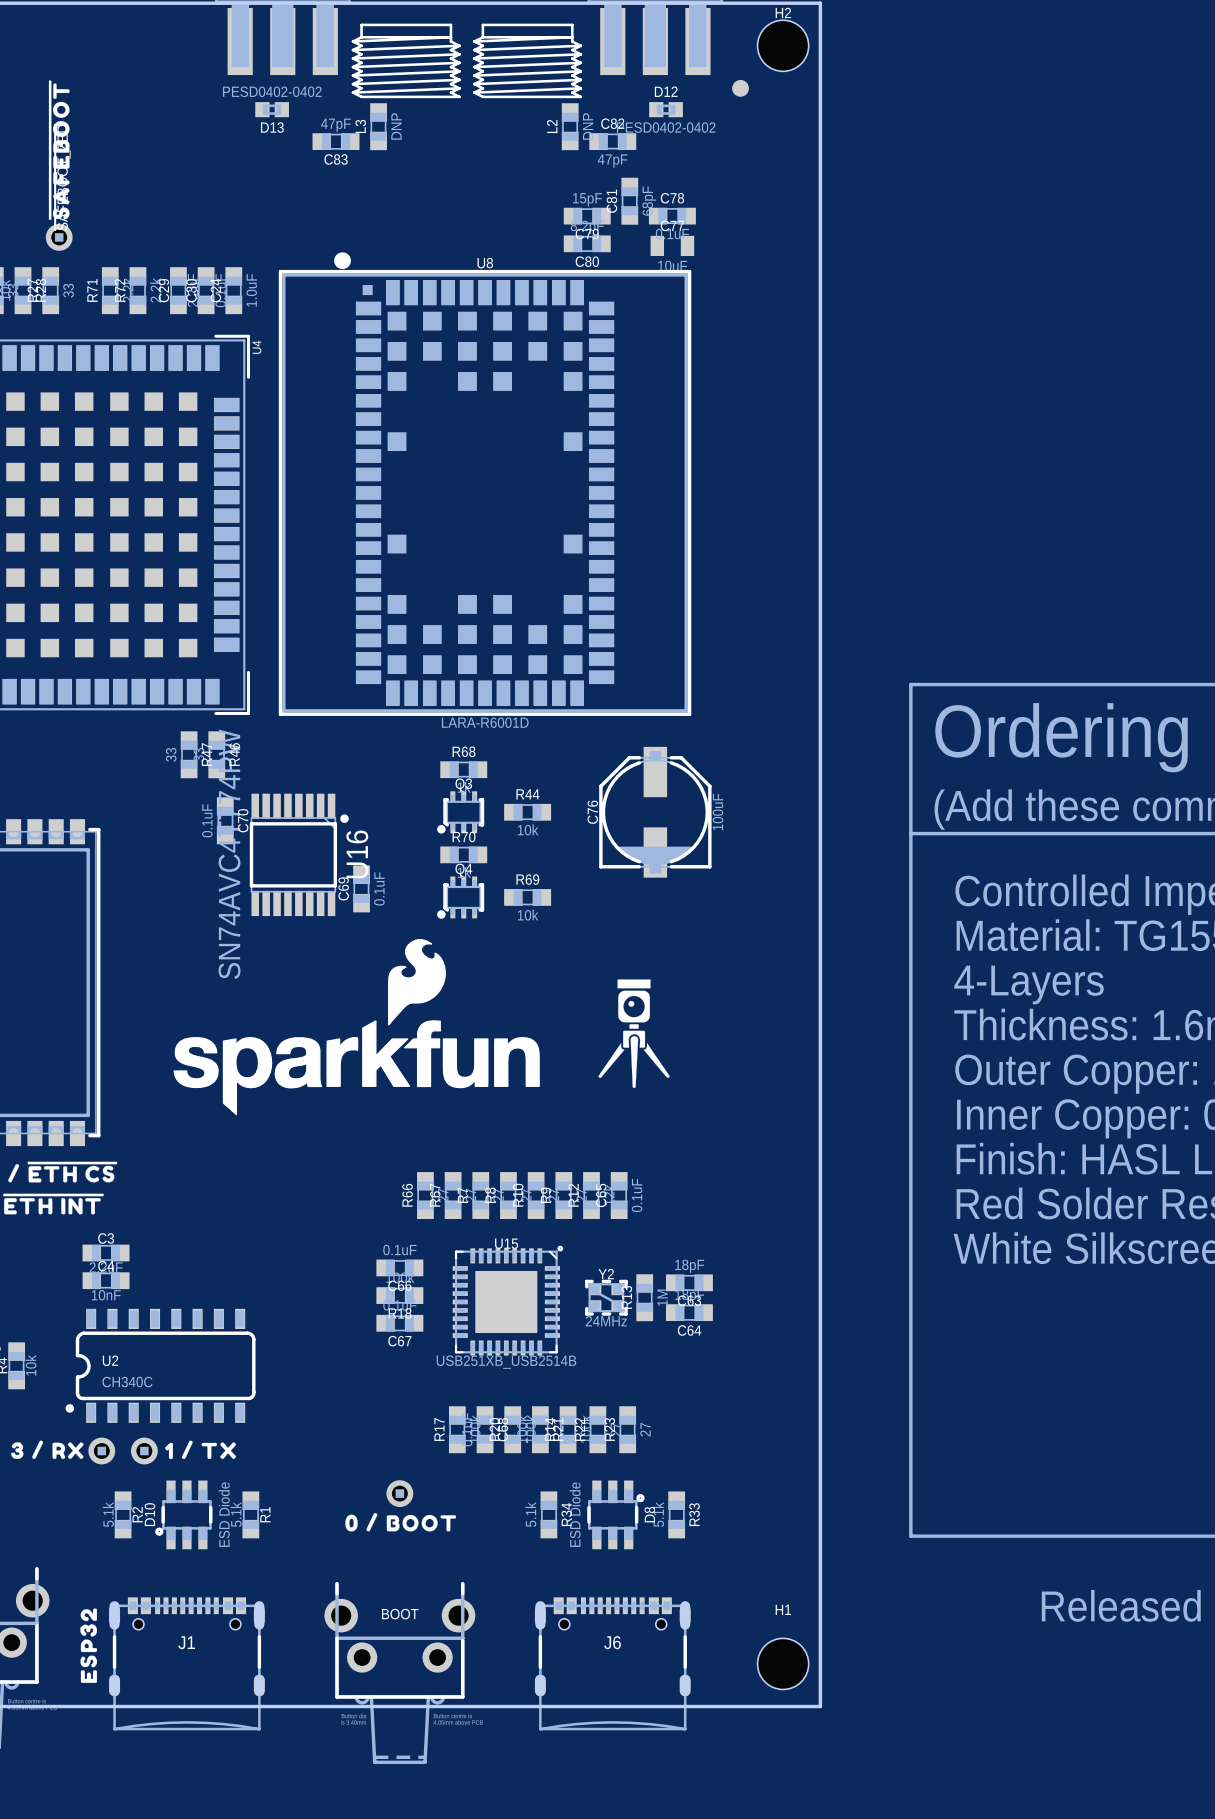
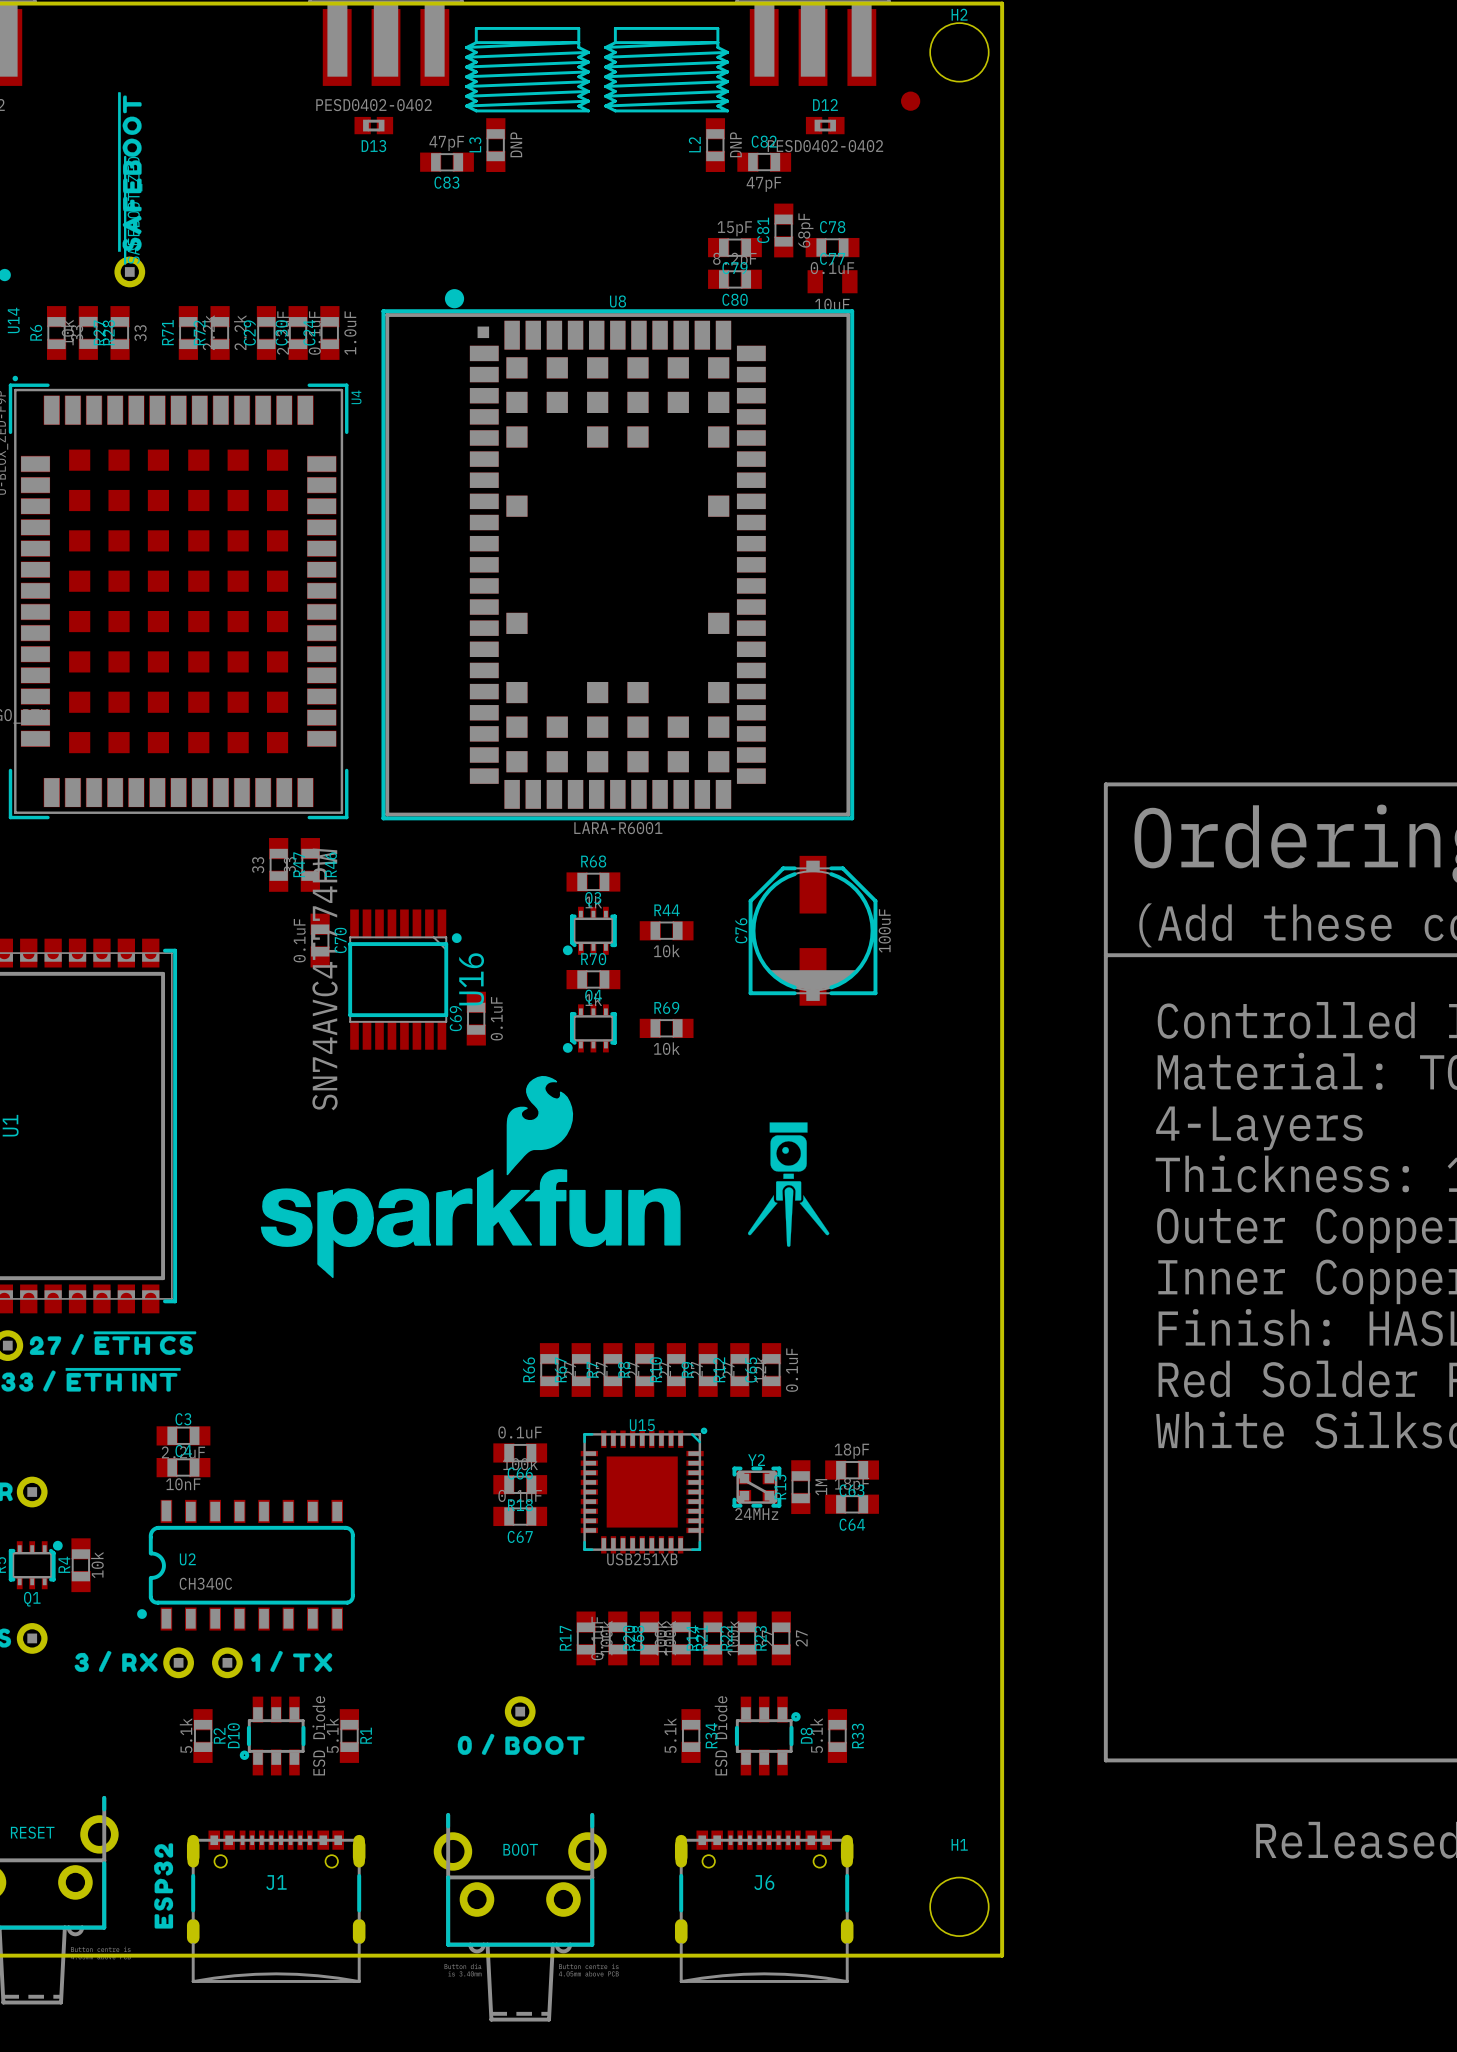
U8 value: LARA-R6001D (485, 722) -> LARA-R6001 (618, 828)
U15 value: USB251XB_USB2514B (506, 1362) -> USB251XB (642, 1559)

